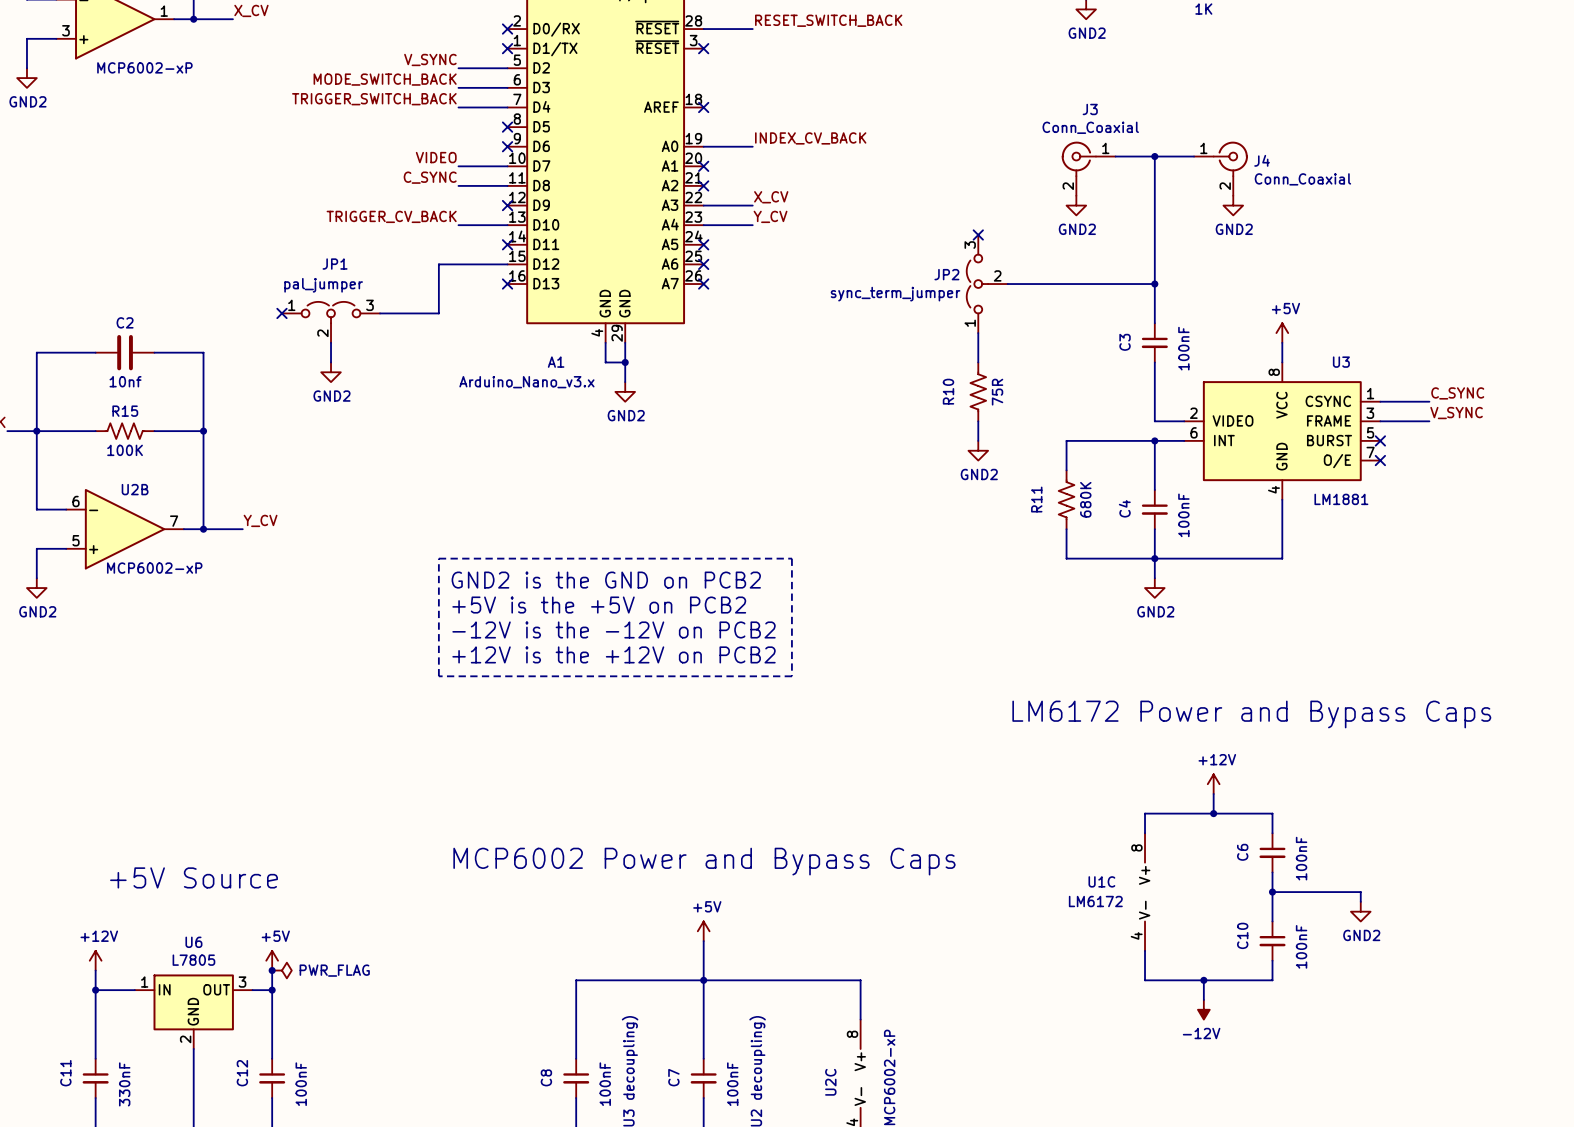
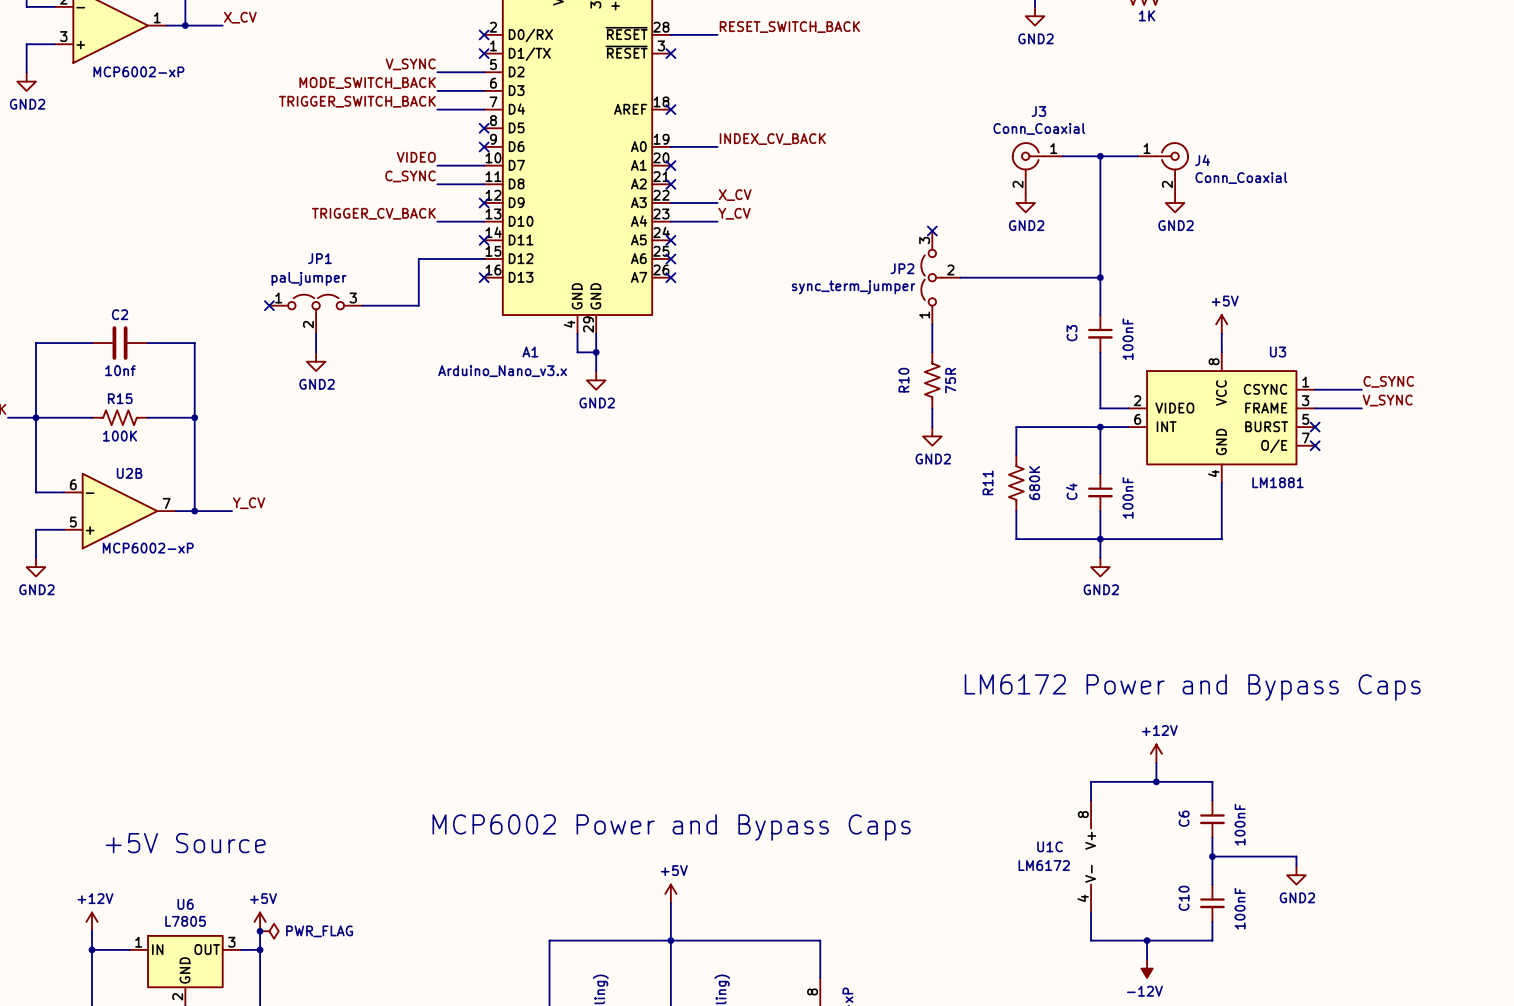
line: (438, 558) (791, 558) (791, 676) (438, 676) (438, 558) -> none
text: GND2 is the GND on PCB2 (606, 580) -> none
text: +5V is the +5V on PCB2 (599, 605) -> none
text: -12V is the -12V on PCB2 (614, 629) -> none
text: +12V is the +12V on PCB2 (614, 654) -> none

